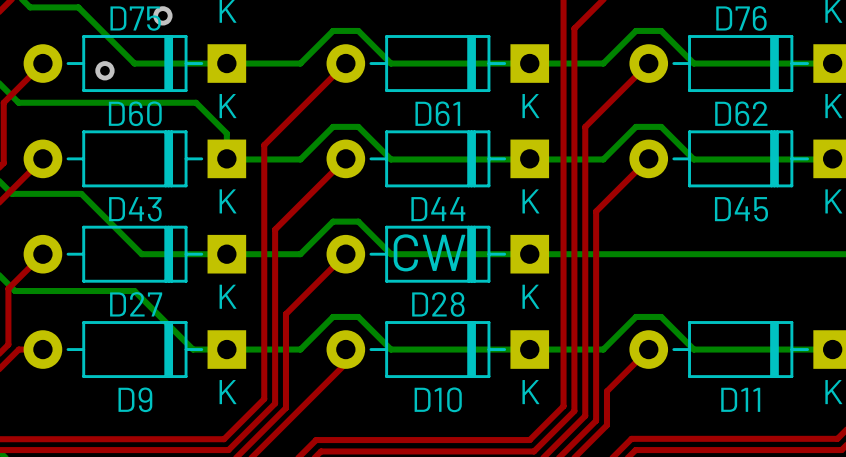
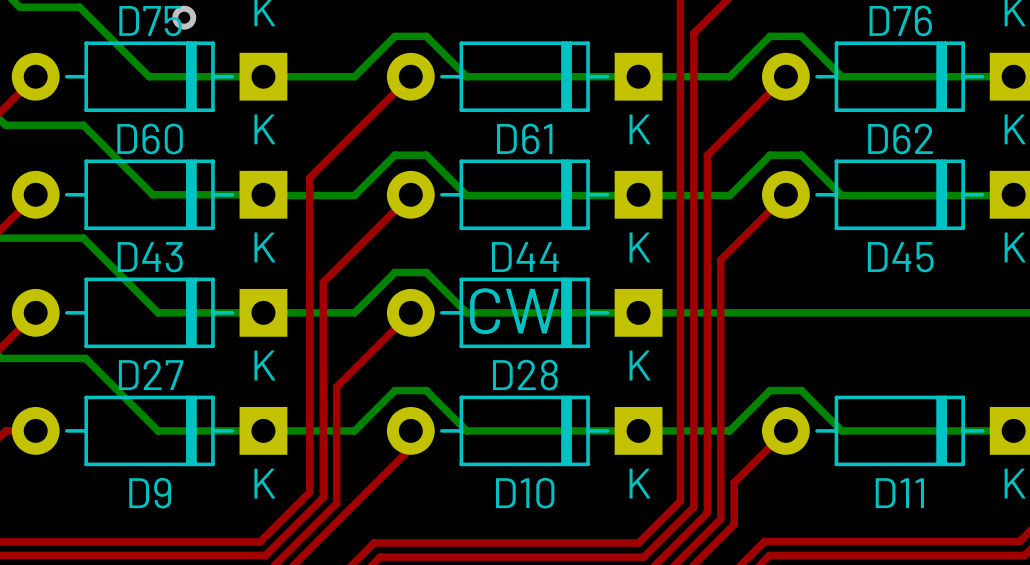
via: (104, 70) -> none
bottom track: (81, 102) (196, 102) (226, 133) (226, 158) -> (83, 125) (152, 194) (263, 194)
bottom track: (83, 291) (134, 291) (193, 349) -> (85, 358) (158, 430) (221, 430)

